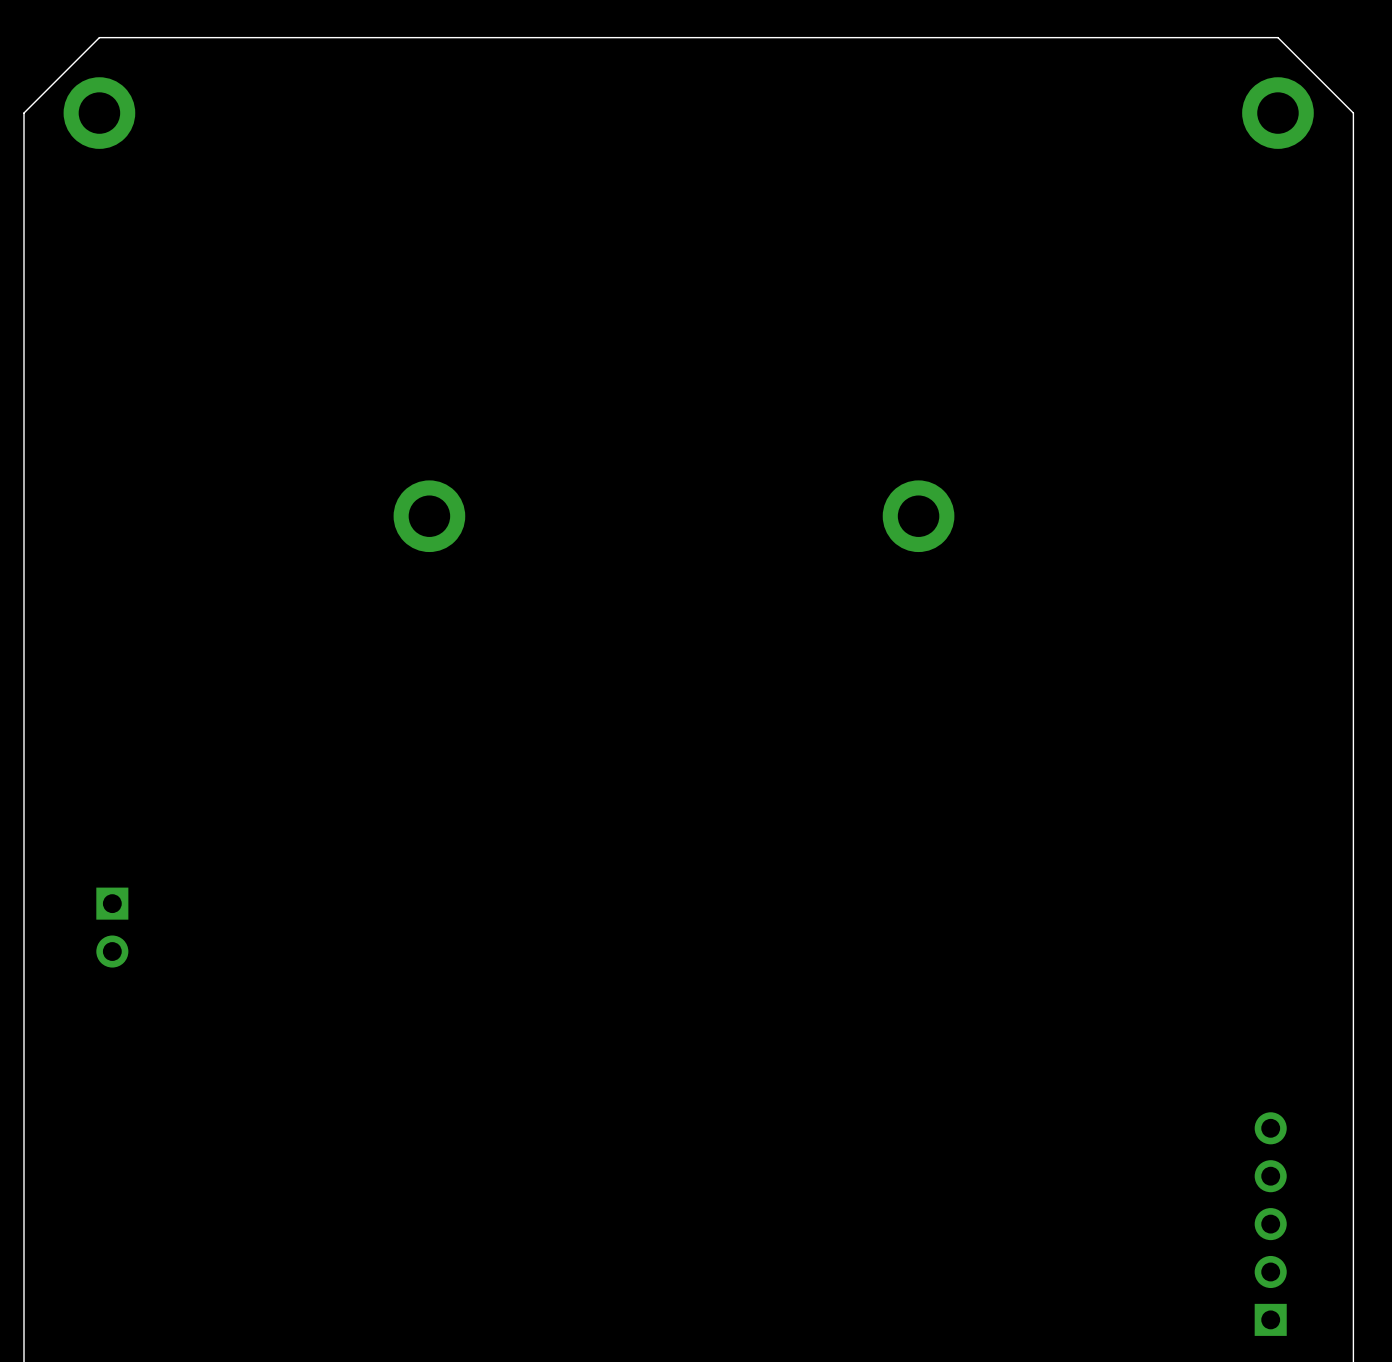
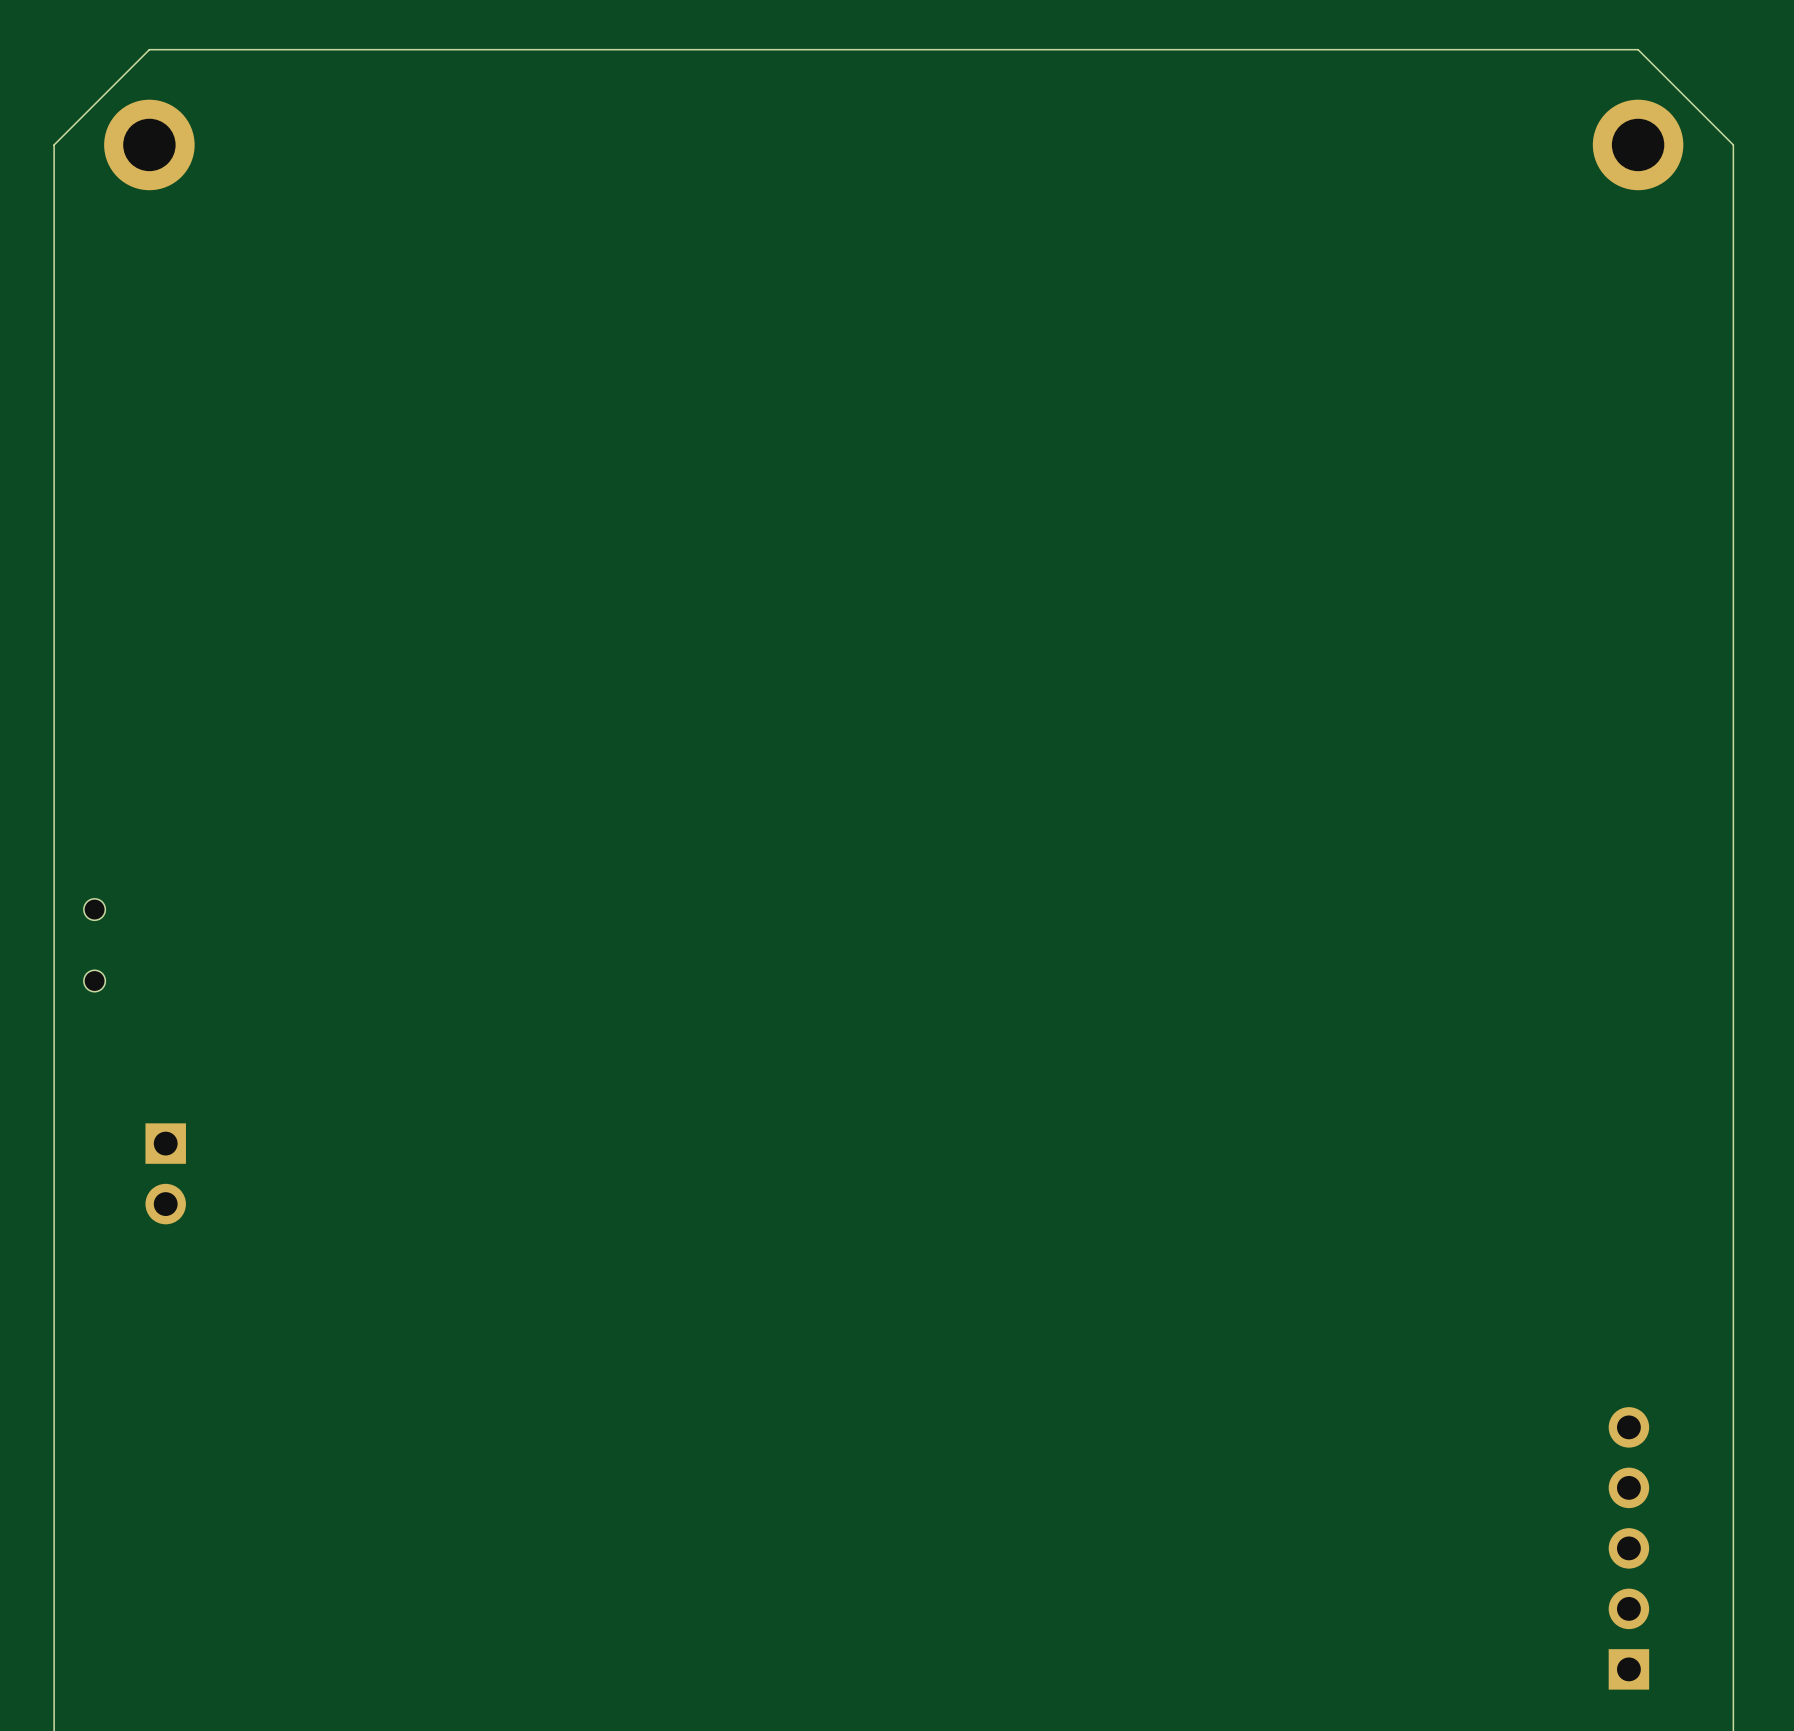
part: (429, 516) -> none
part: (918, 516) -> none
part: none -> (94, 945)

